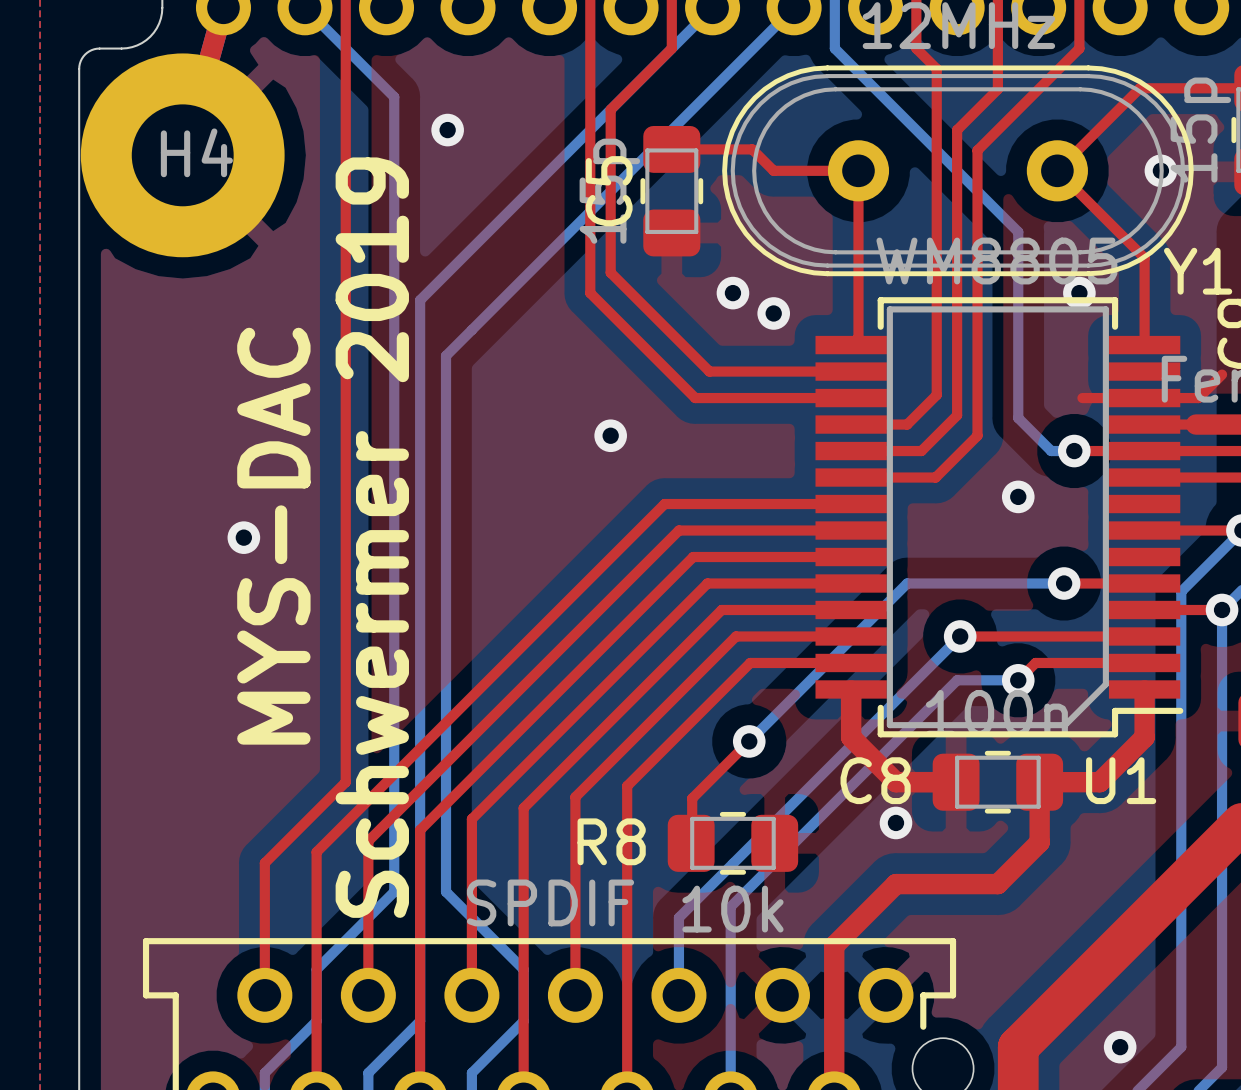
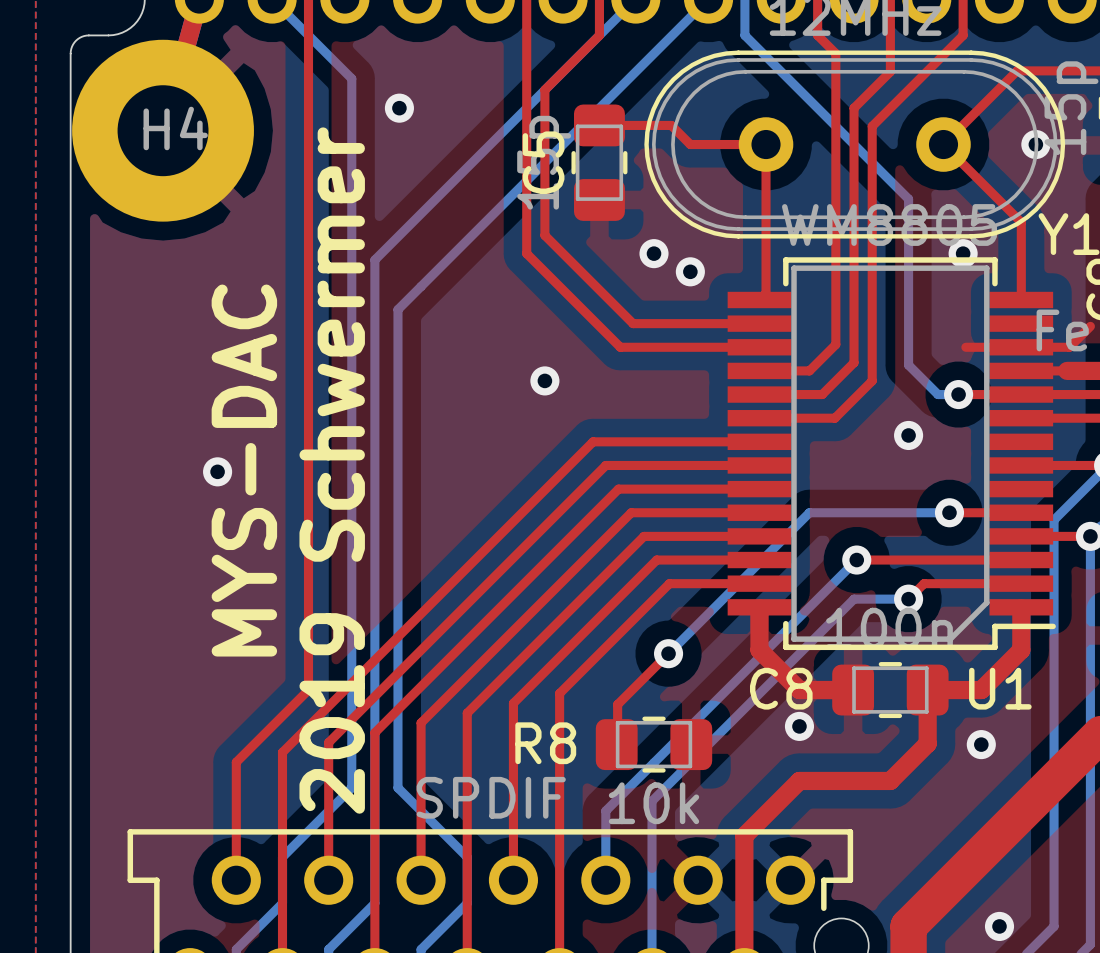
text: Schwermer 2019 (372, 537) -> 2019 Schwermer (332, 470)
via: none -> (981, 744)

